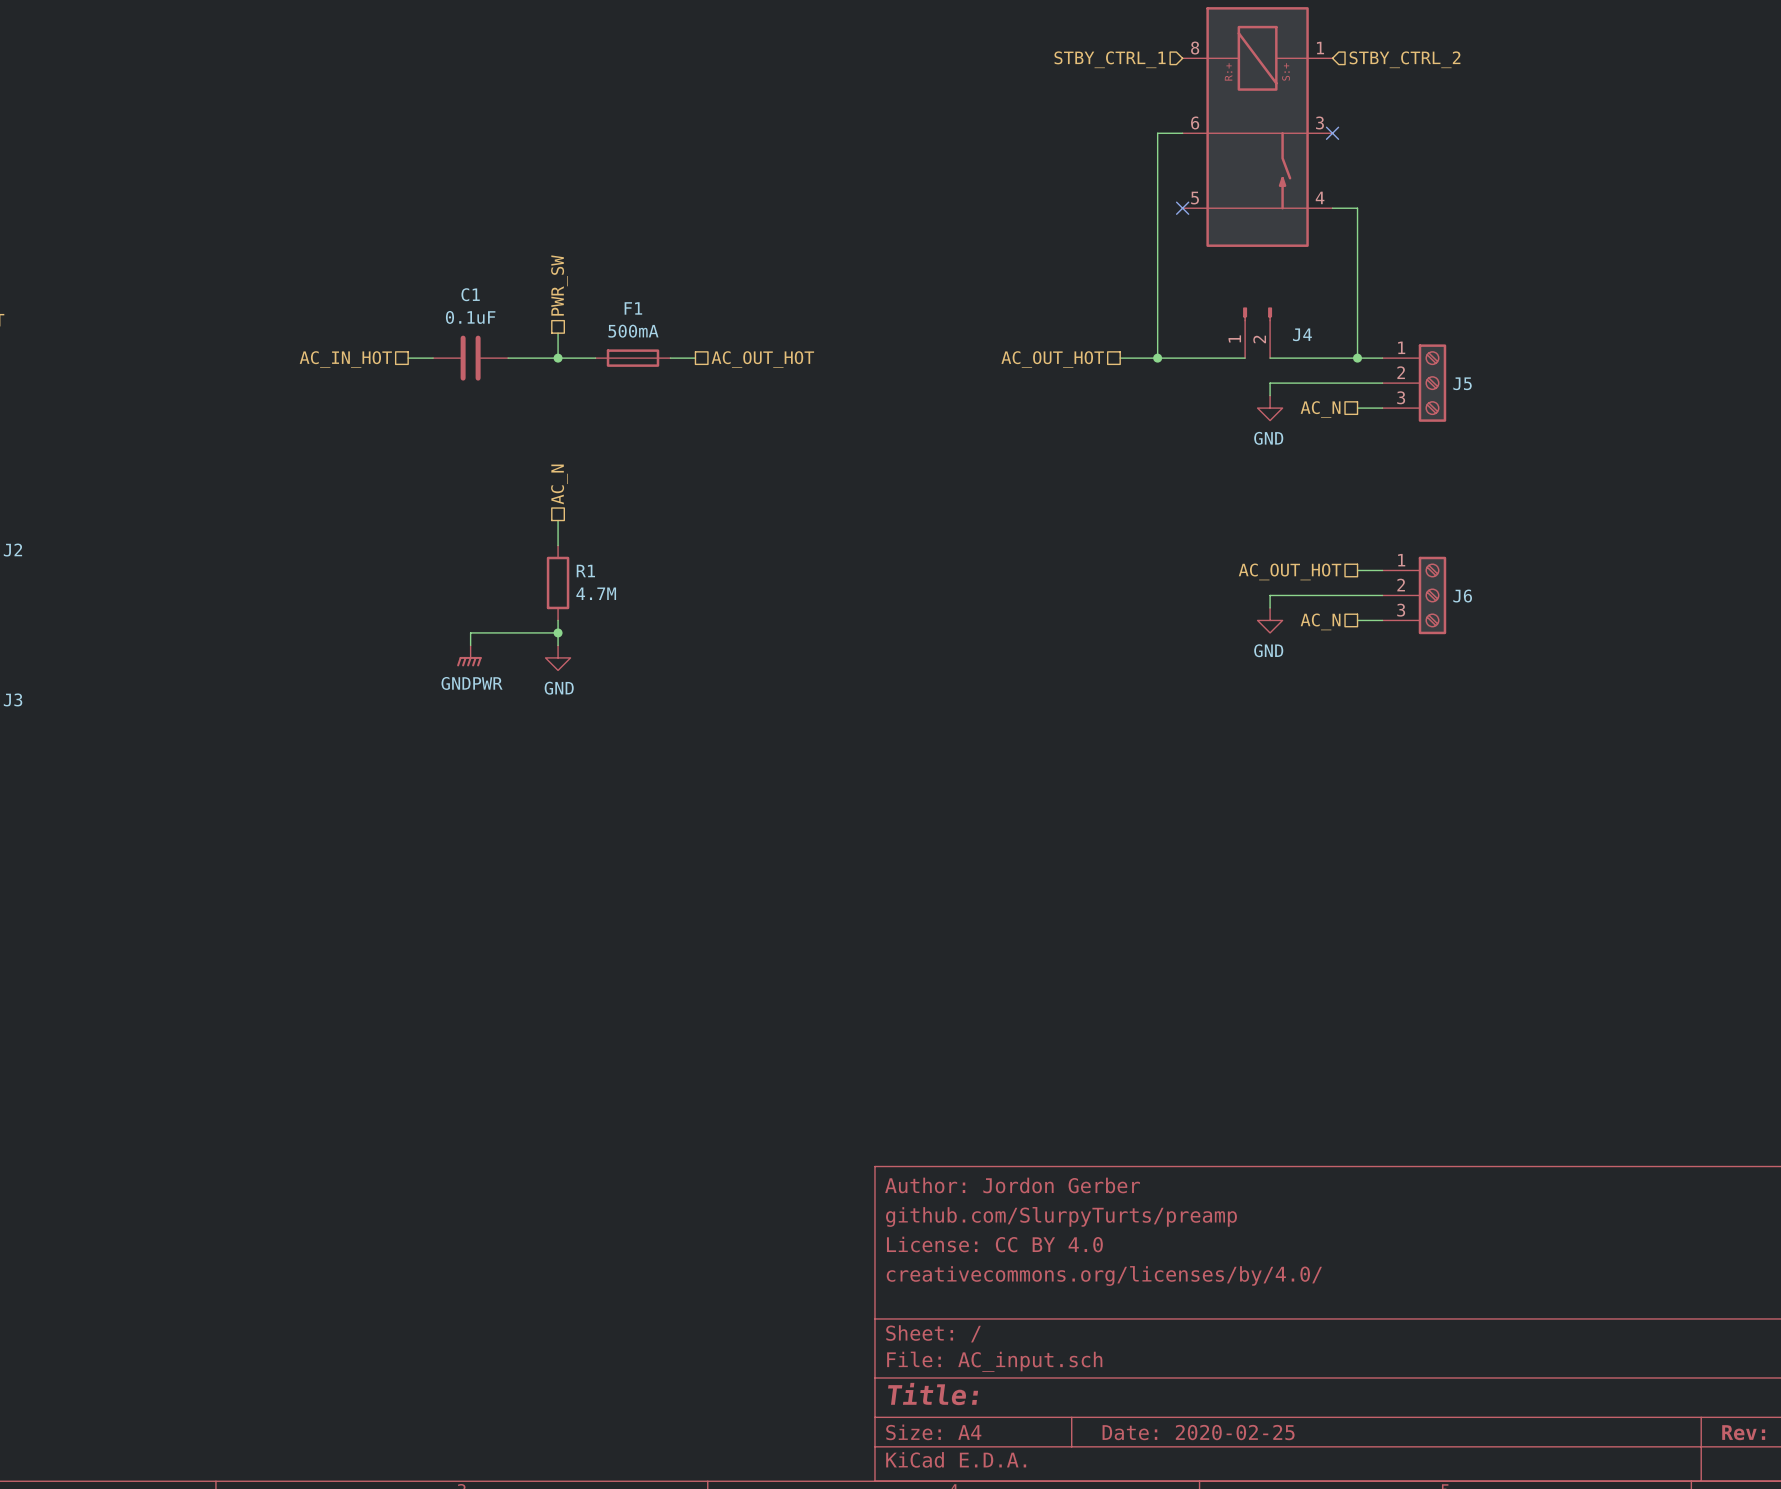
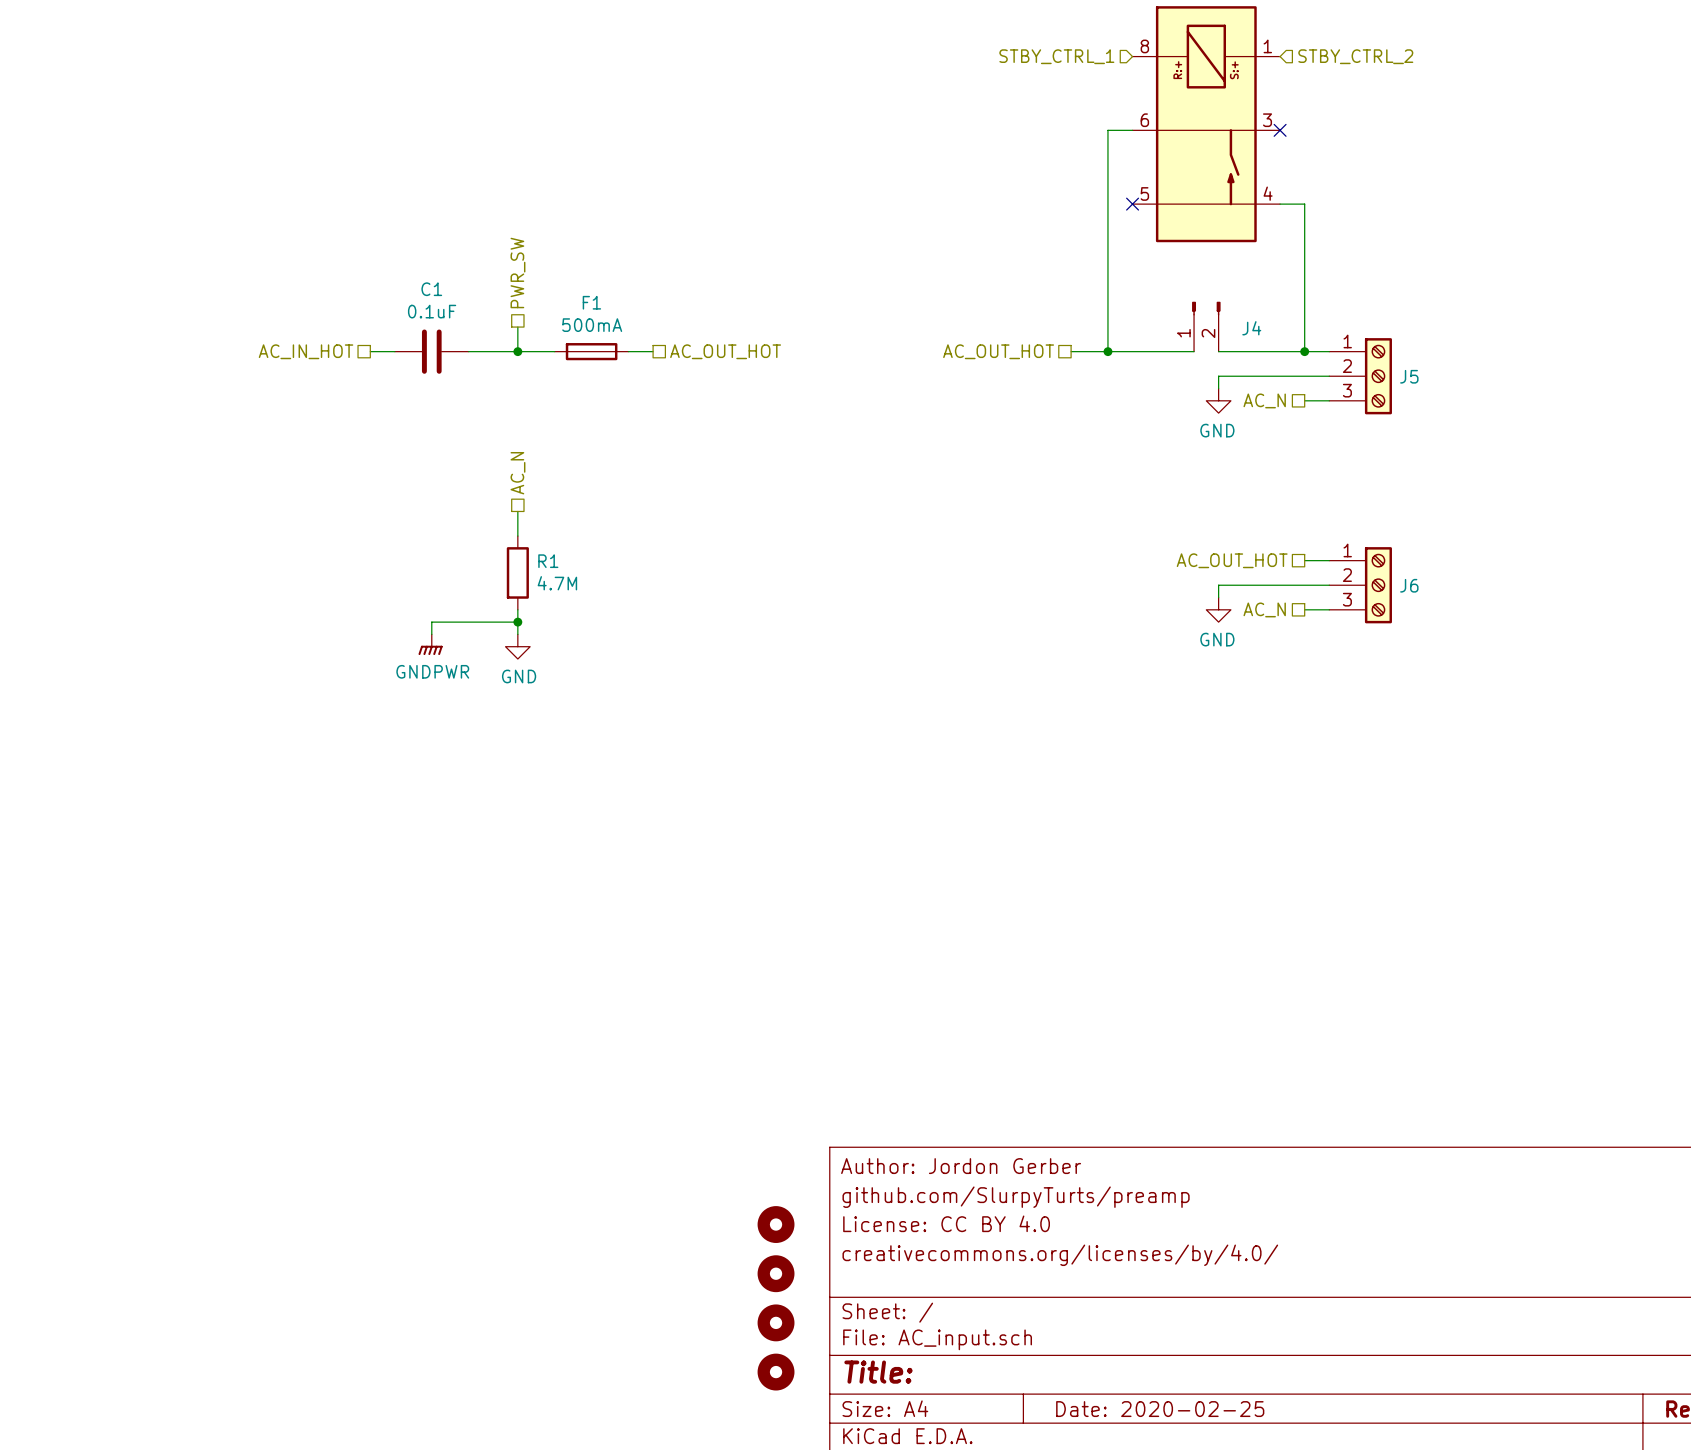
part: none -> (776, 1224)
part: none -> (776, 1273)
part: none -> (776, 1322)
part: none -> (776, 1372)

